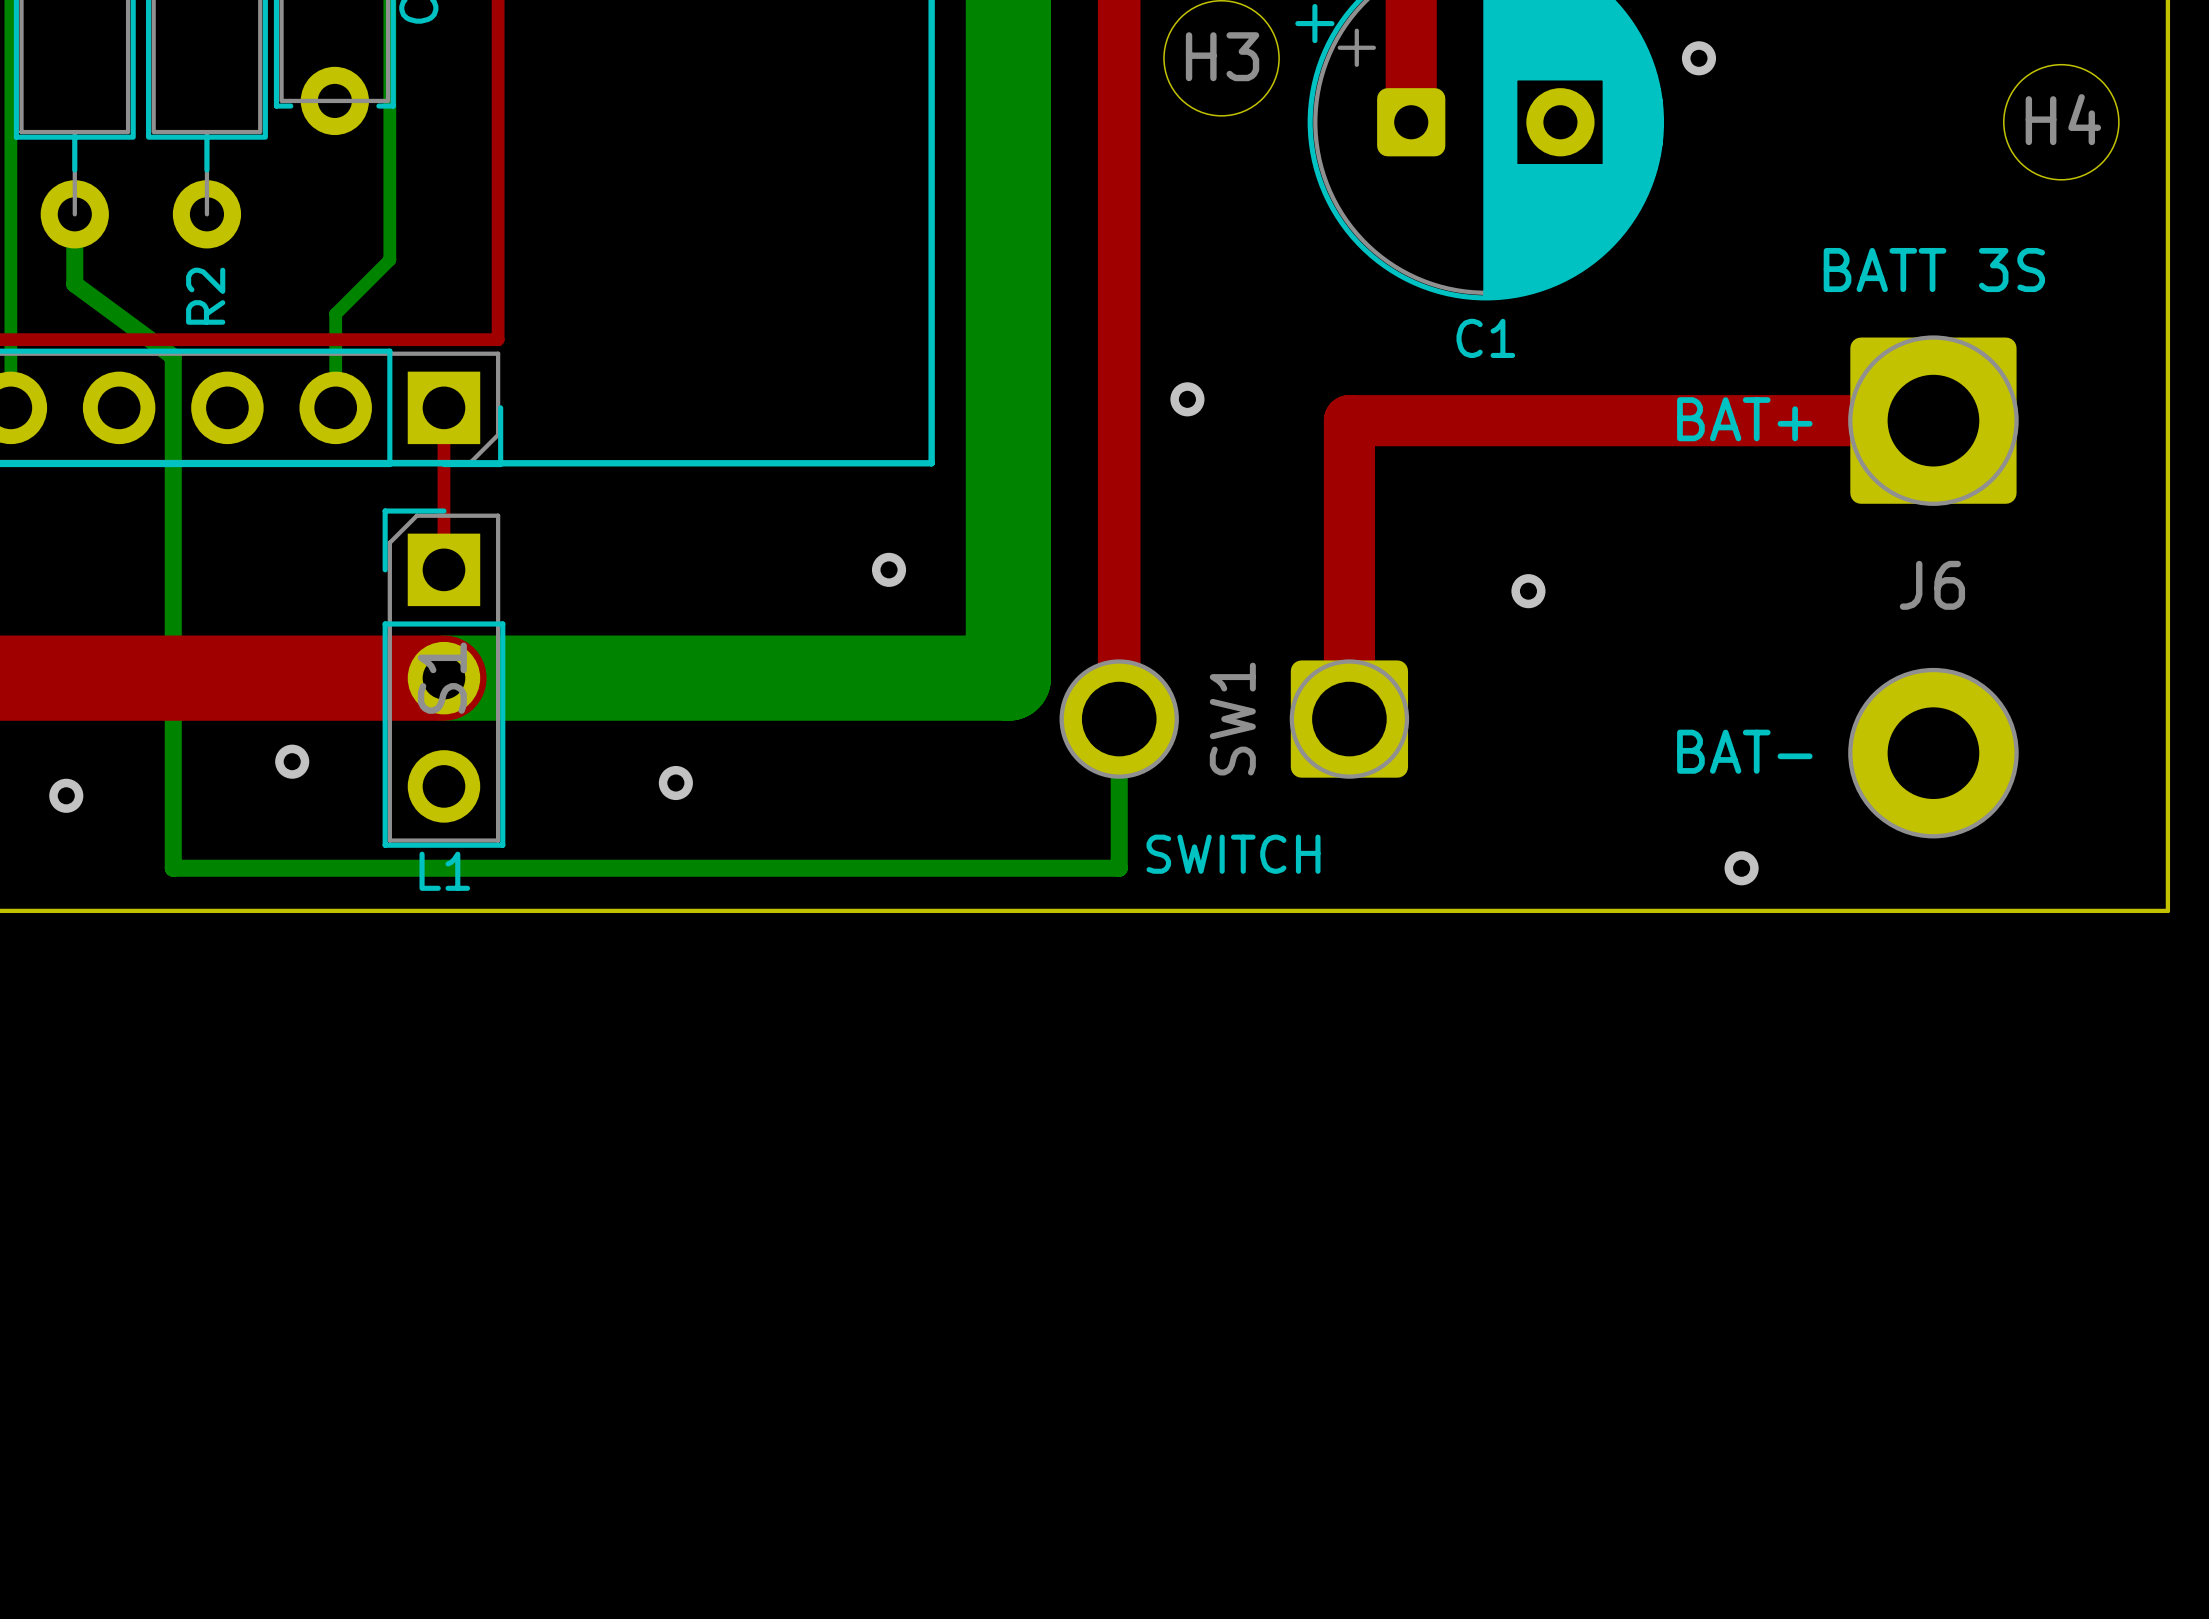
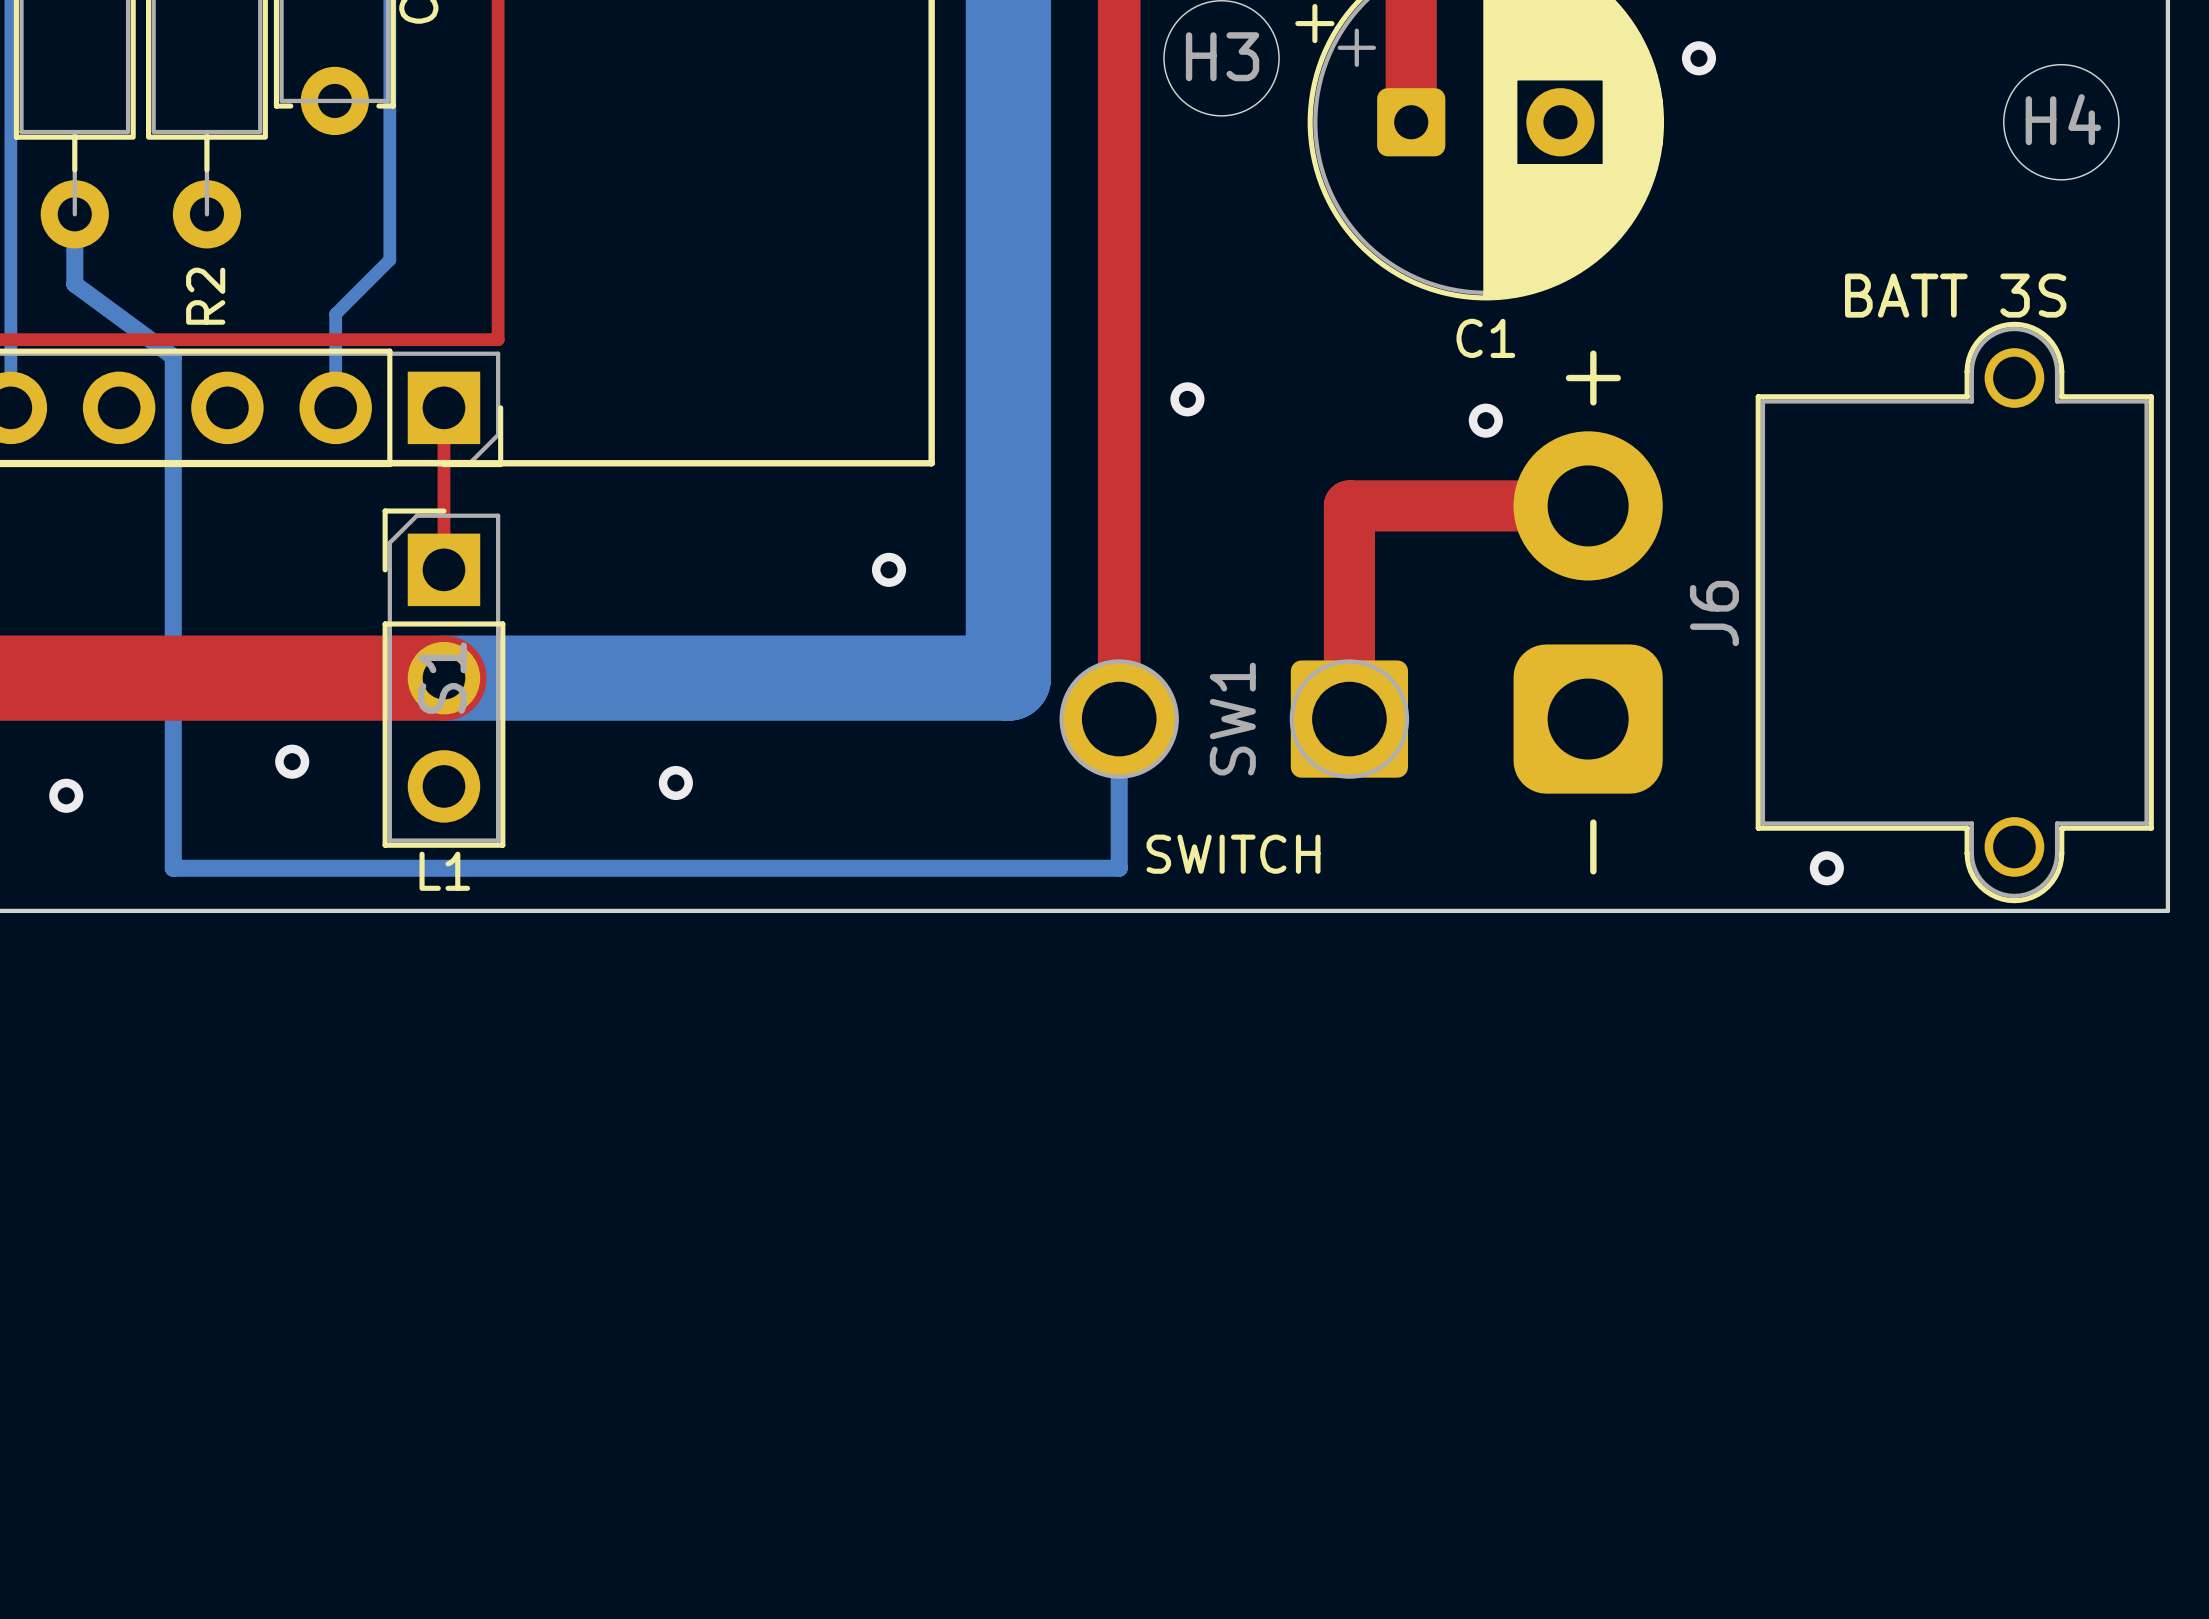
text position: BATT 3S (1934, 270) -> BATT 3S (1955, 295)
J6 footprint: [1848, 335, 2019, 839] -> [1513, 321, 2154, 904]
text: BAT+ (1744, 419) -> none
top track: (1933, 420) (1349, 420) (1349, 505) -> (1588, 505) (1349, 505)
J6 name position: J6 (1932, 585) -> J6 (1714, 613)
via position: (1528, 591) -> (1485, 420)
text: BAT- (1744, 751) -> none
via position: (1741, 868) -> (1826, 868)

